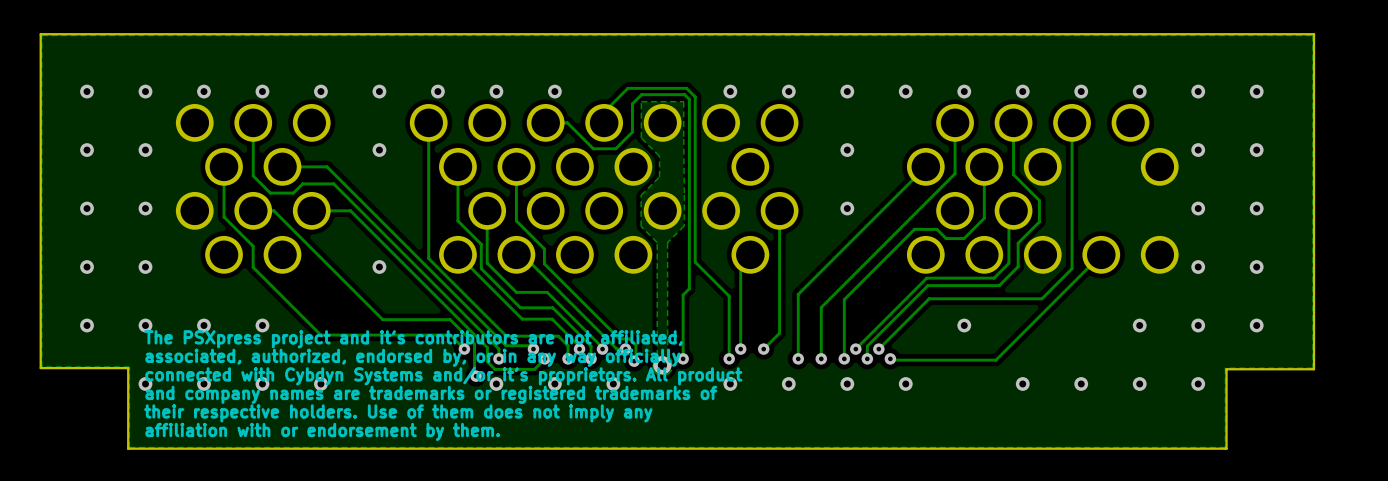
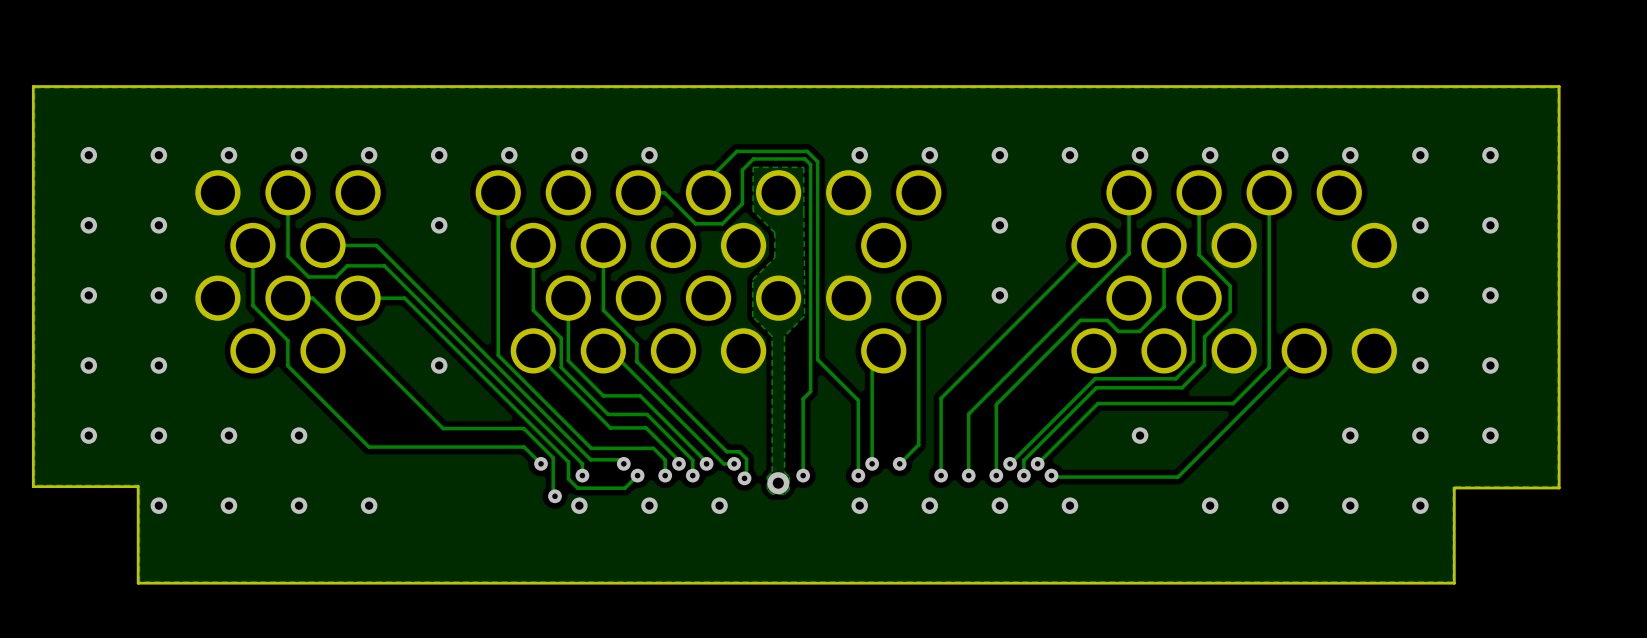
text: The PSXpress project and it's contributors are not affiliated, (413, 339) -> none
text: associated, authorized, endorsed by, or in any way officially (412, 357) -> none
text: connected with Cybdyn Systems and/or it's proprietors. All product (443, 376) -> none
text: and company names are trademarks or registered trademarks of (431, 394) -> none
text: their respective holders. Use of them does not imply any (398, 413) -> none
text: affiliation with or endorsement by them. (322, 431) -> none

